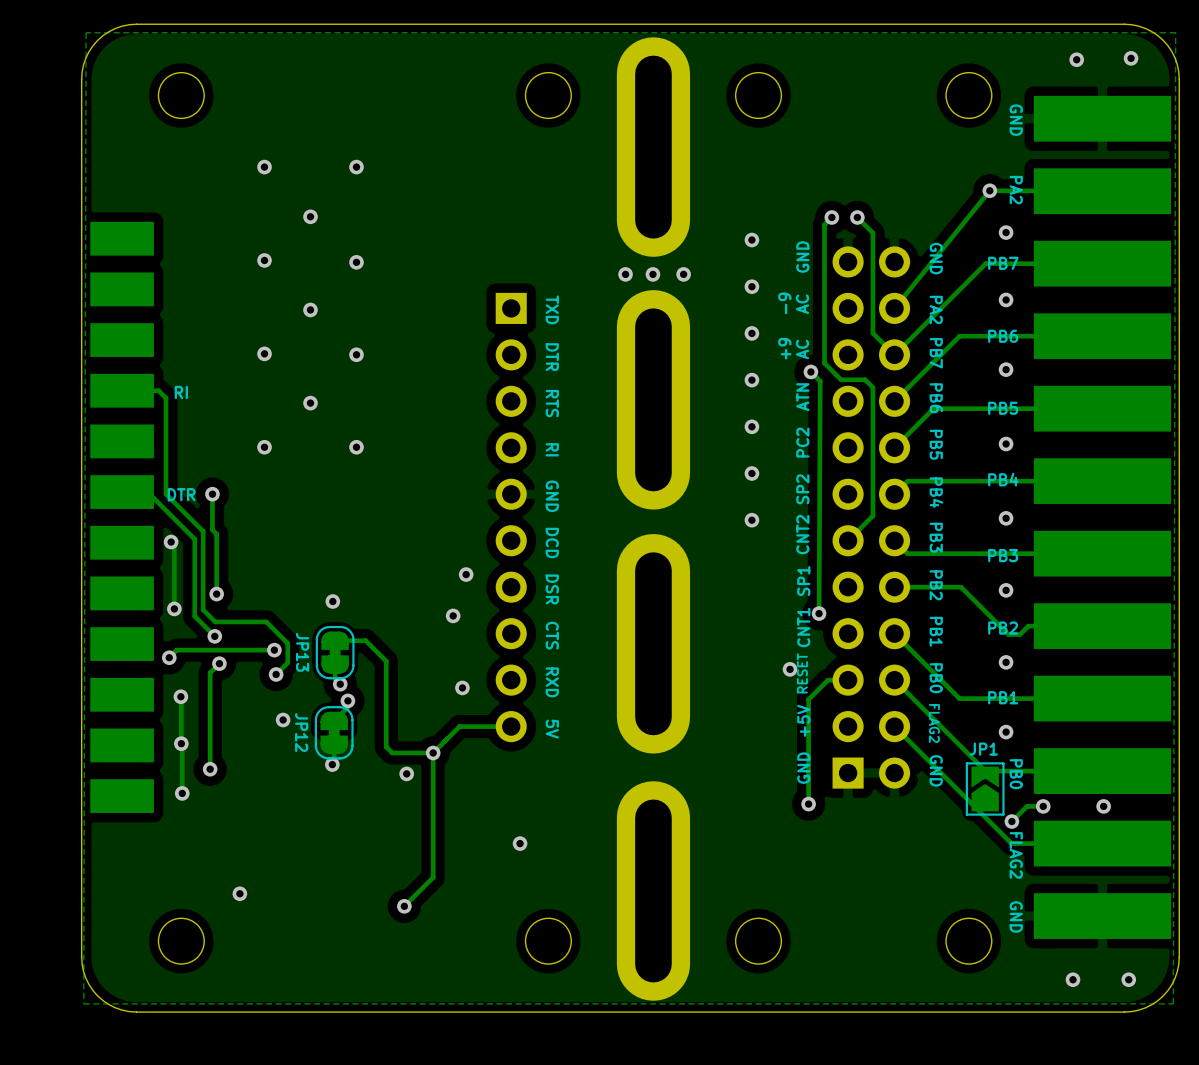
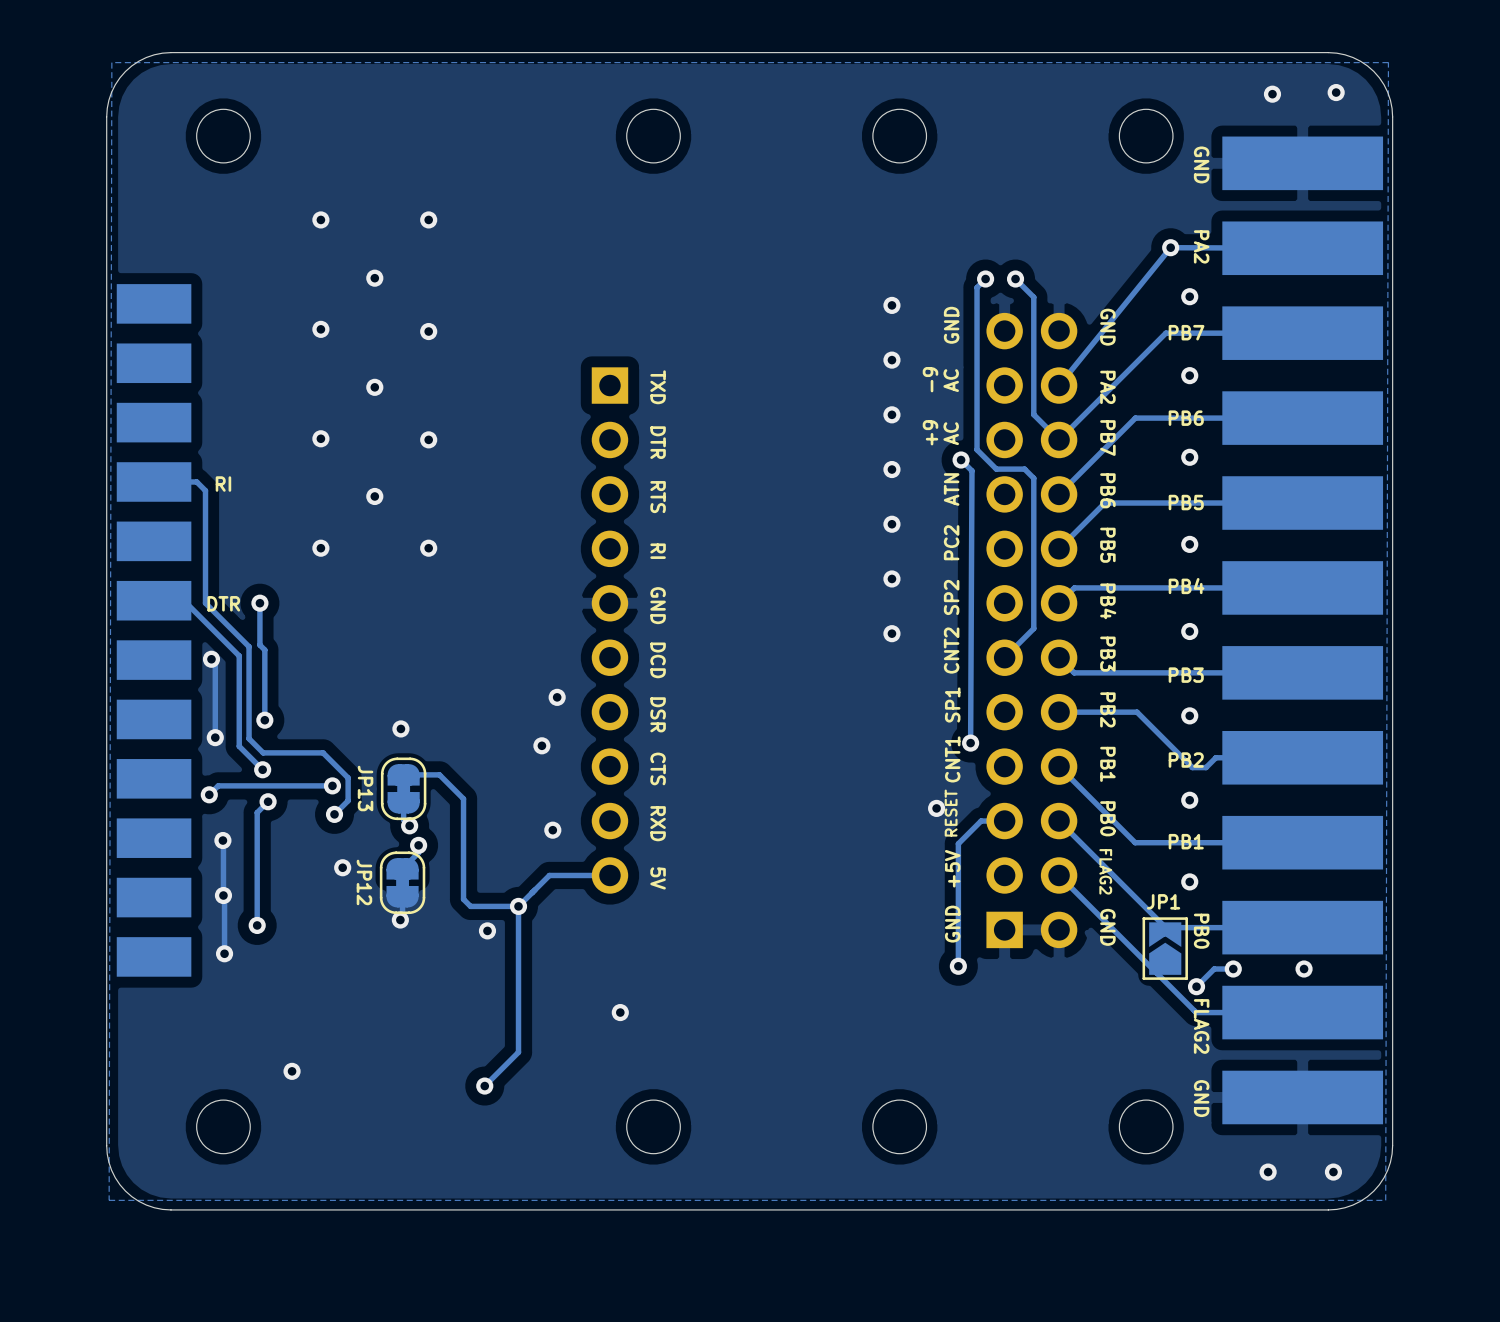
part: (653, 147) -> none
via: (625, 274) -> none
via: (652, 274) -> none
via: (683, 274) -> none
part: (653, 399) -> none
part: (653, 643) -> none
part: (653, 890) -> none

